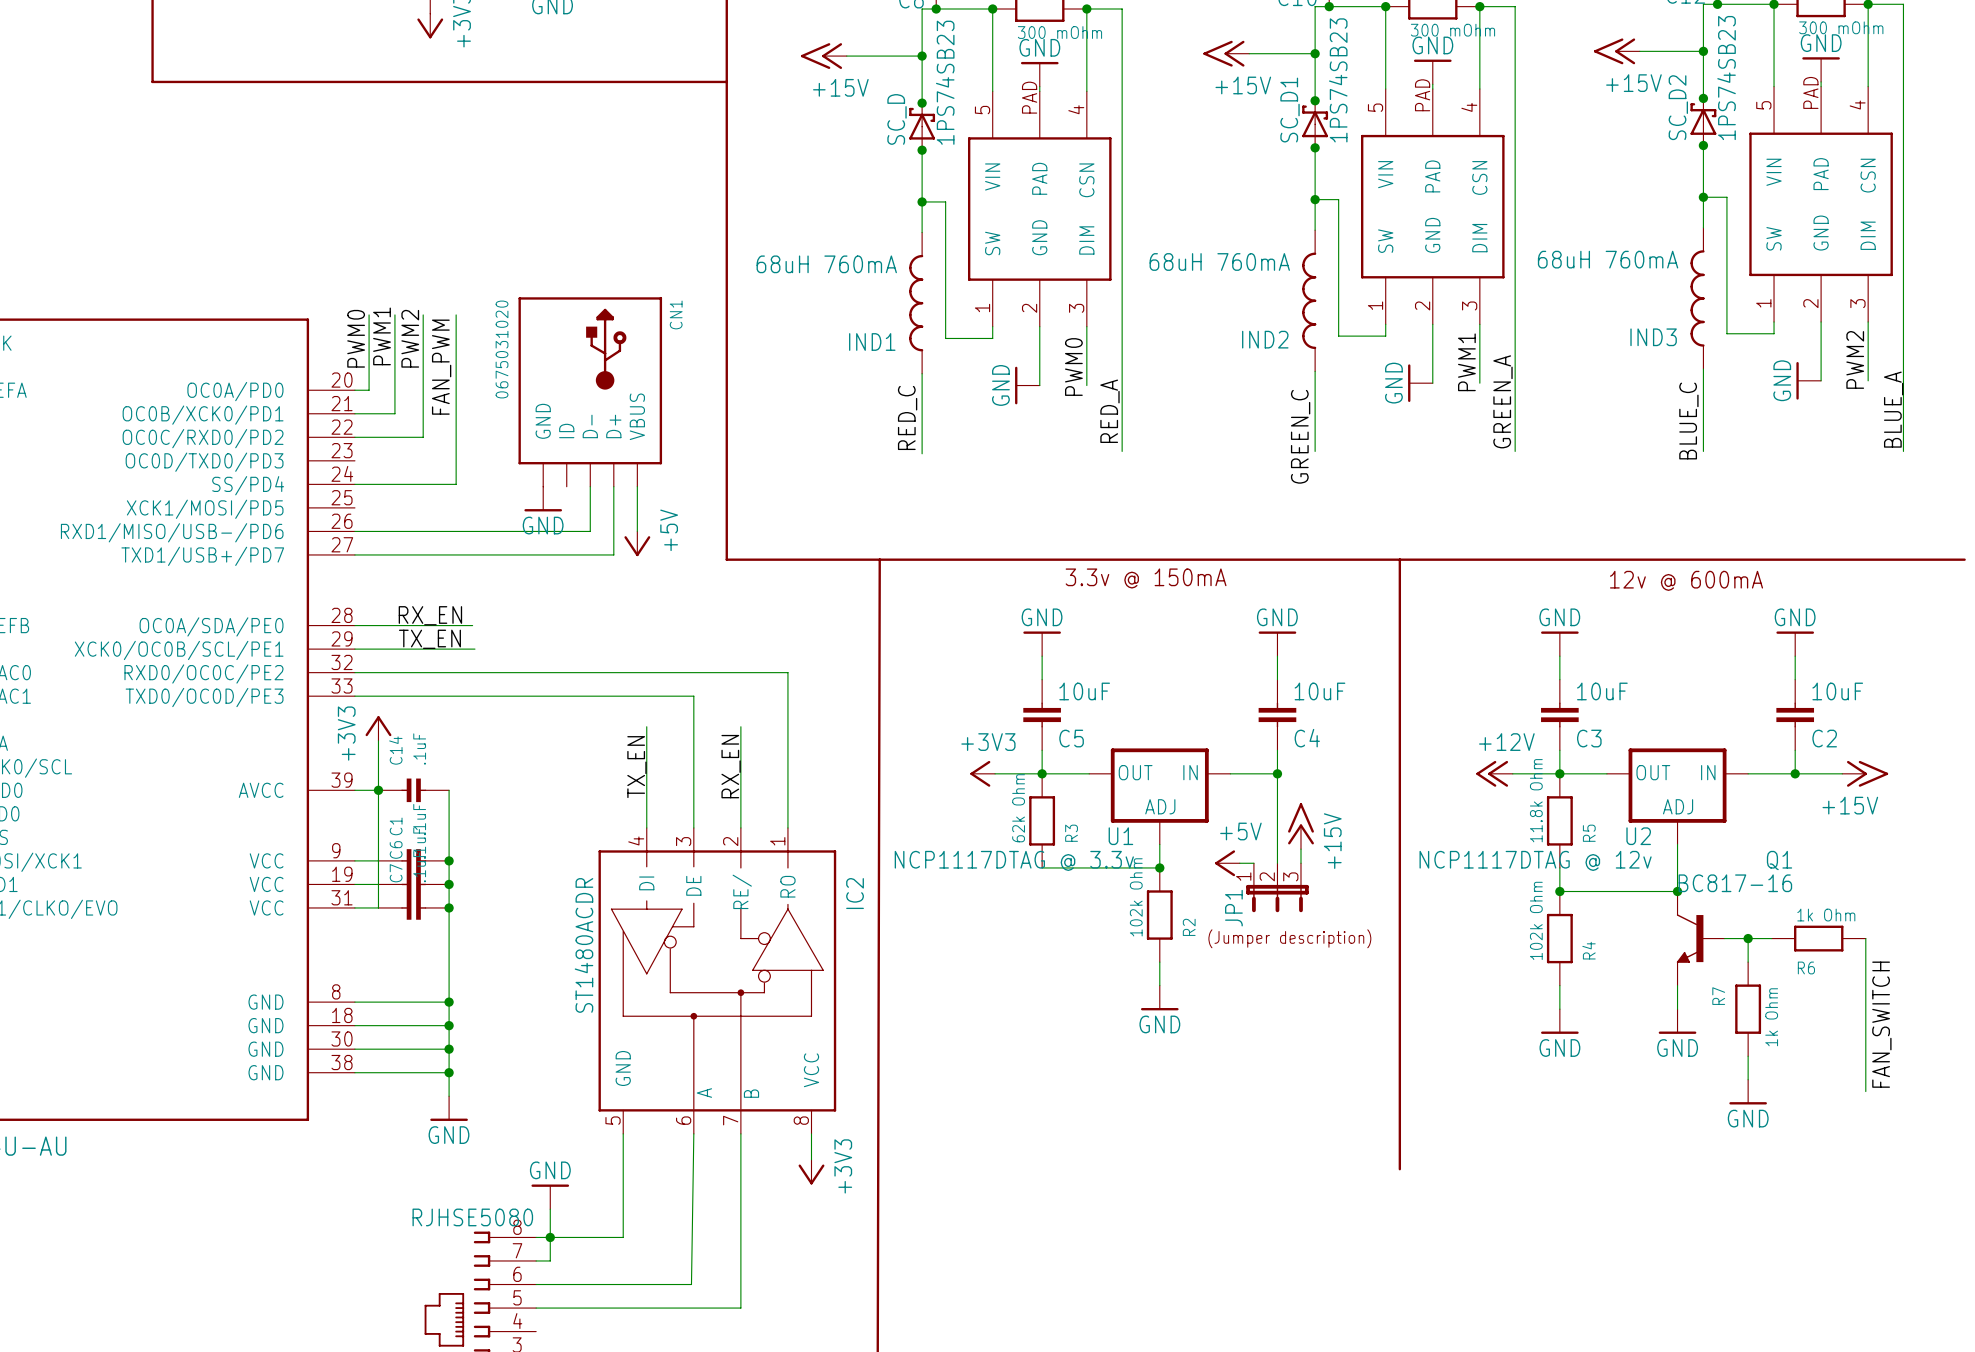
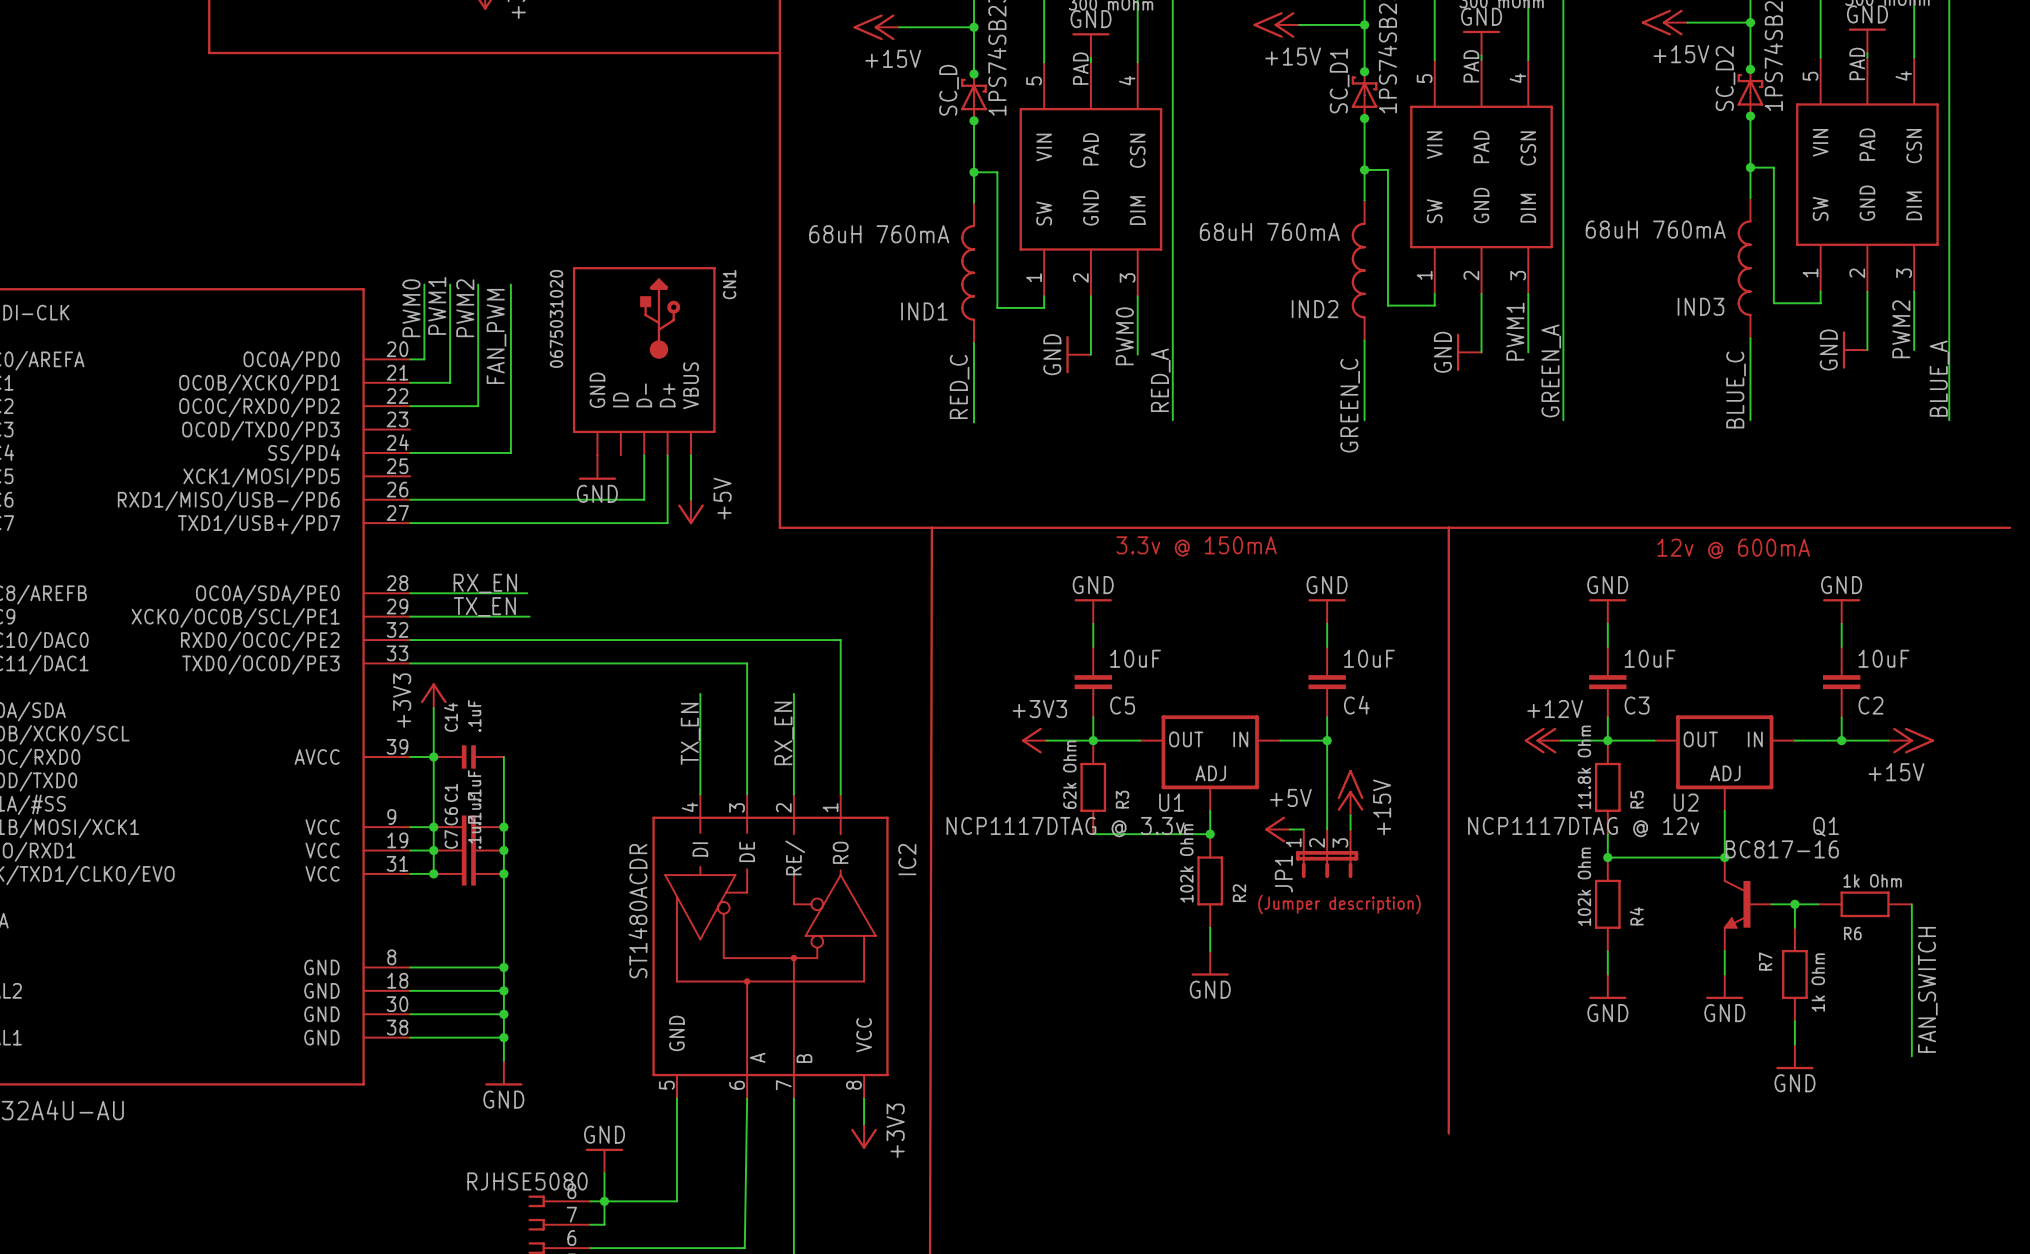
junction: none -> (433, 827)
junction: none -> (433, 850)
junction: none -> (433, 873)

